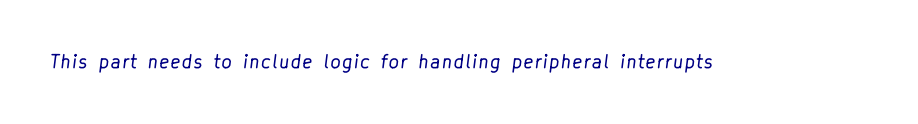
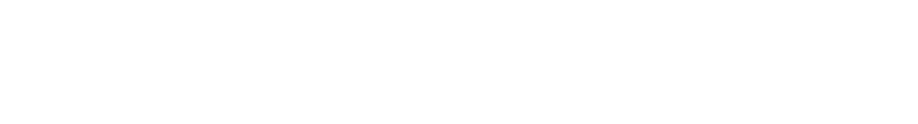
text: This part needs to include logic for handling peripheral interrupts (381, 63) -> none

